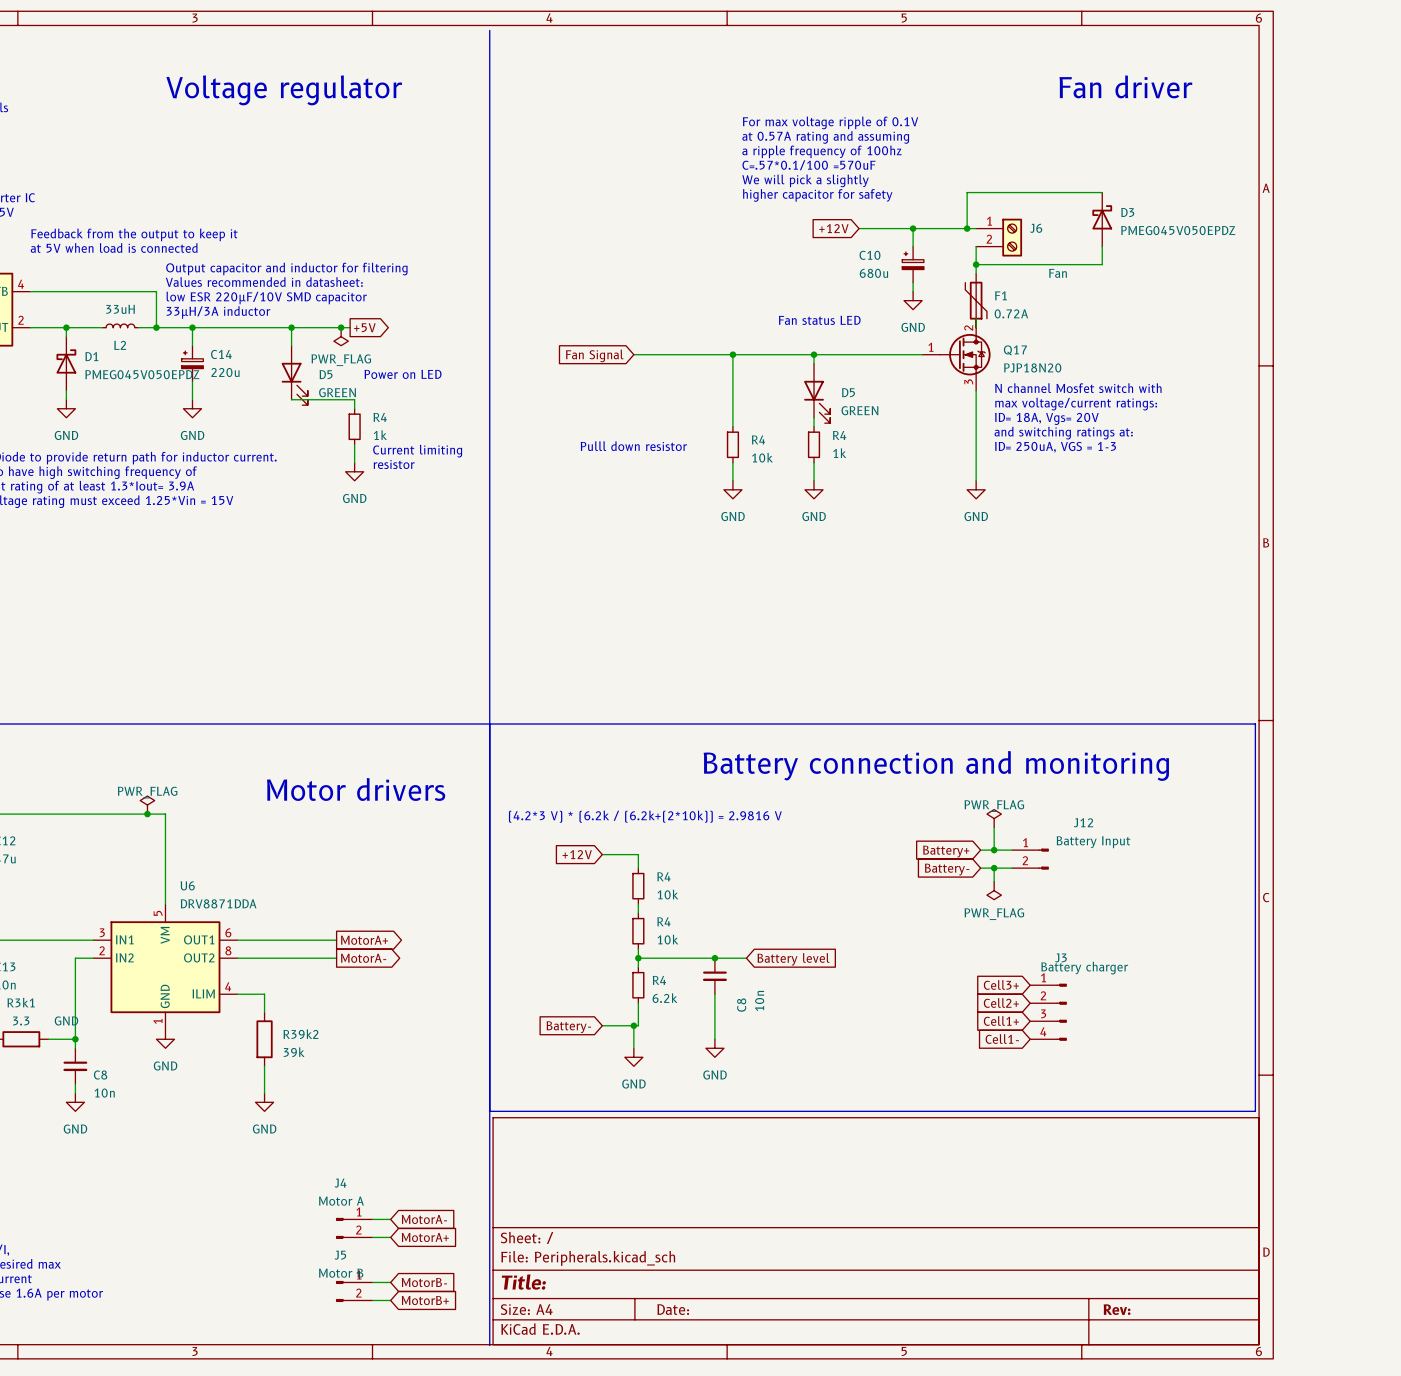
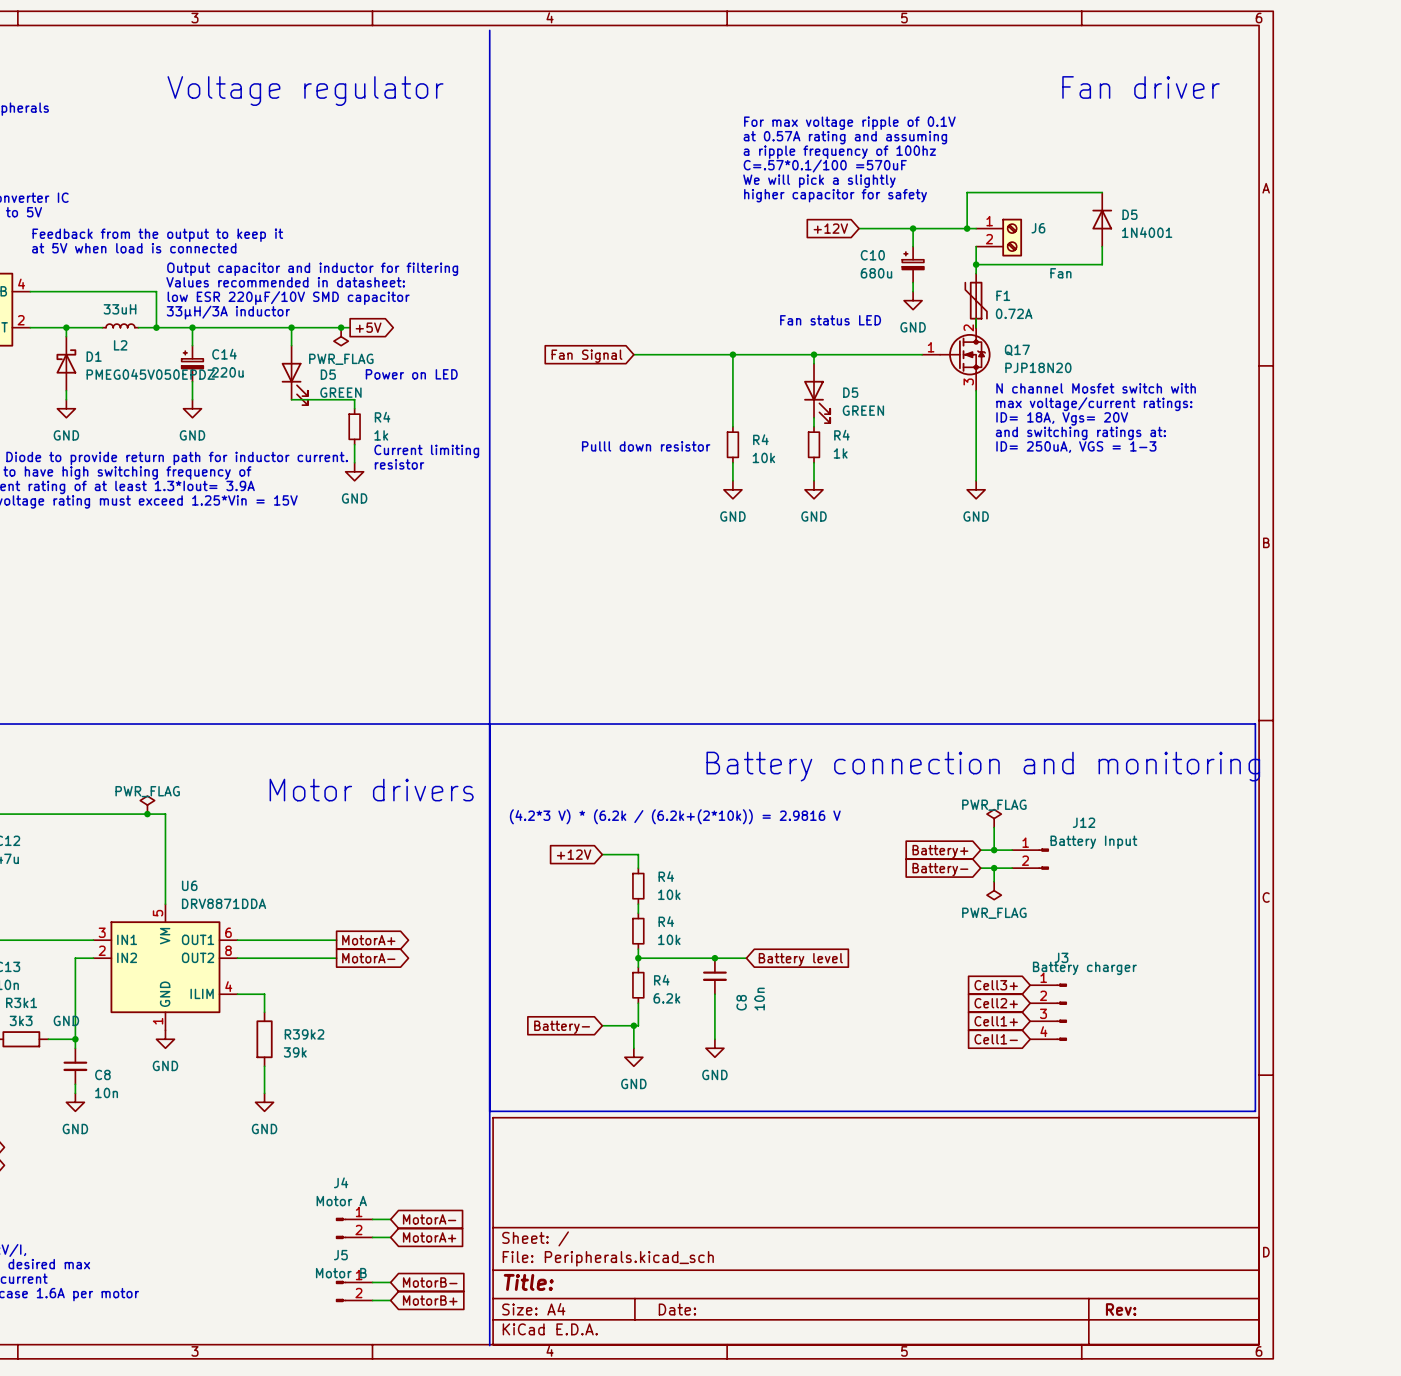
D3: PMEG045V050EPDZ (1102, 219) -> none
D5: none -> 1N4001 (1102, 219)
R3k1 value: 3.3 (21, 1021) -> 3k3 (21, 1020)

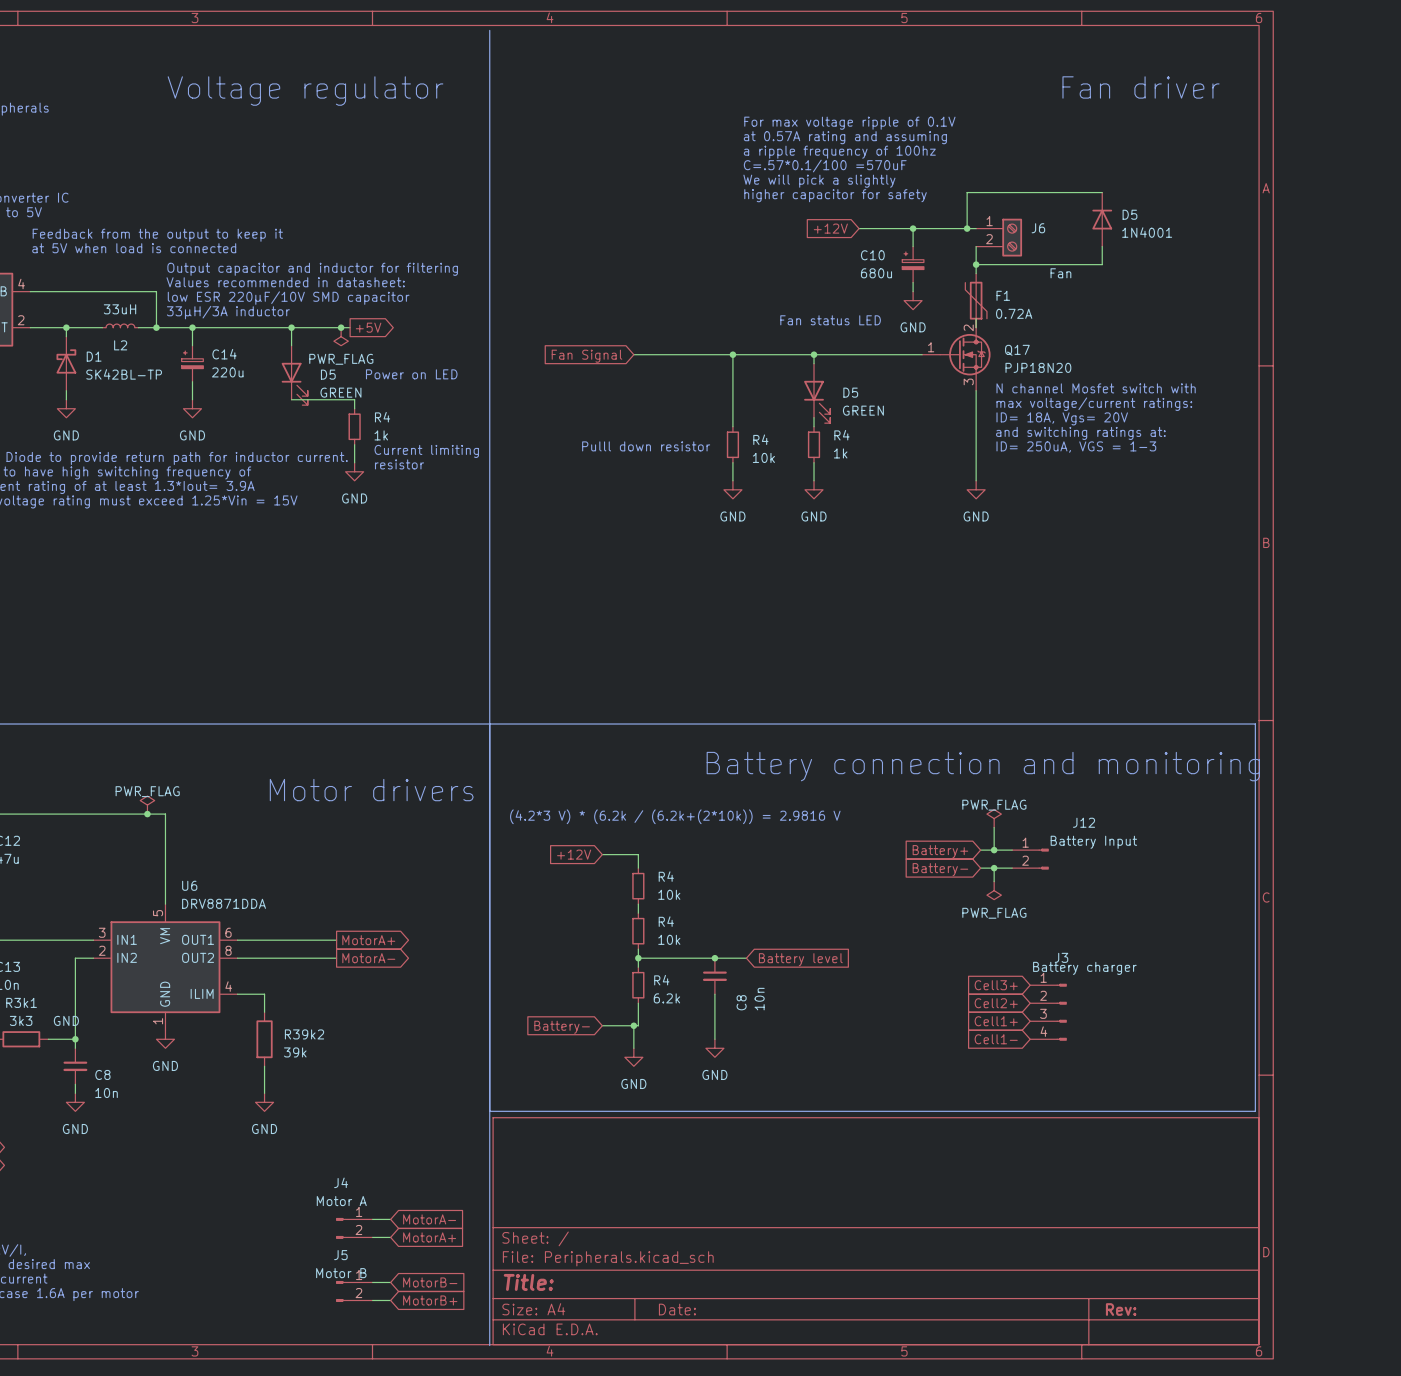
D1 value: PMEG045V050EPDZ (150, 374) -> SK42BL-TP (124, 374)

